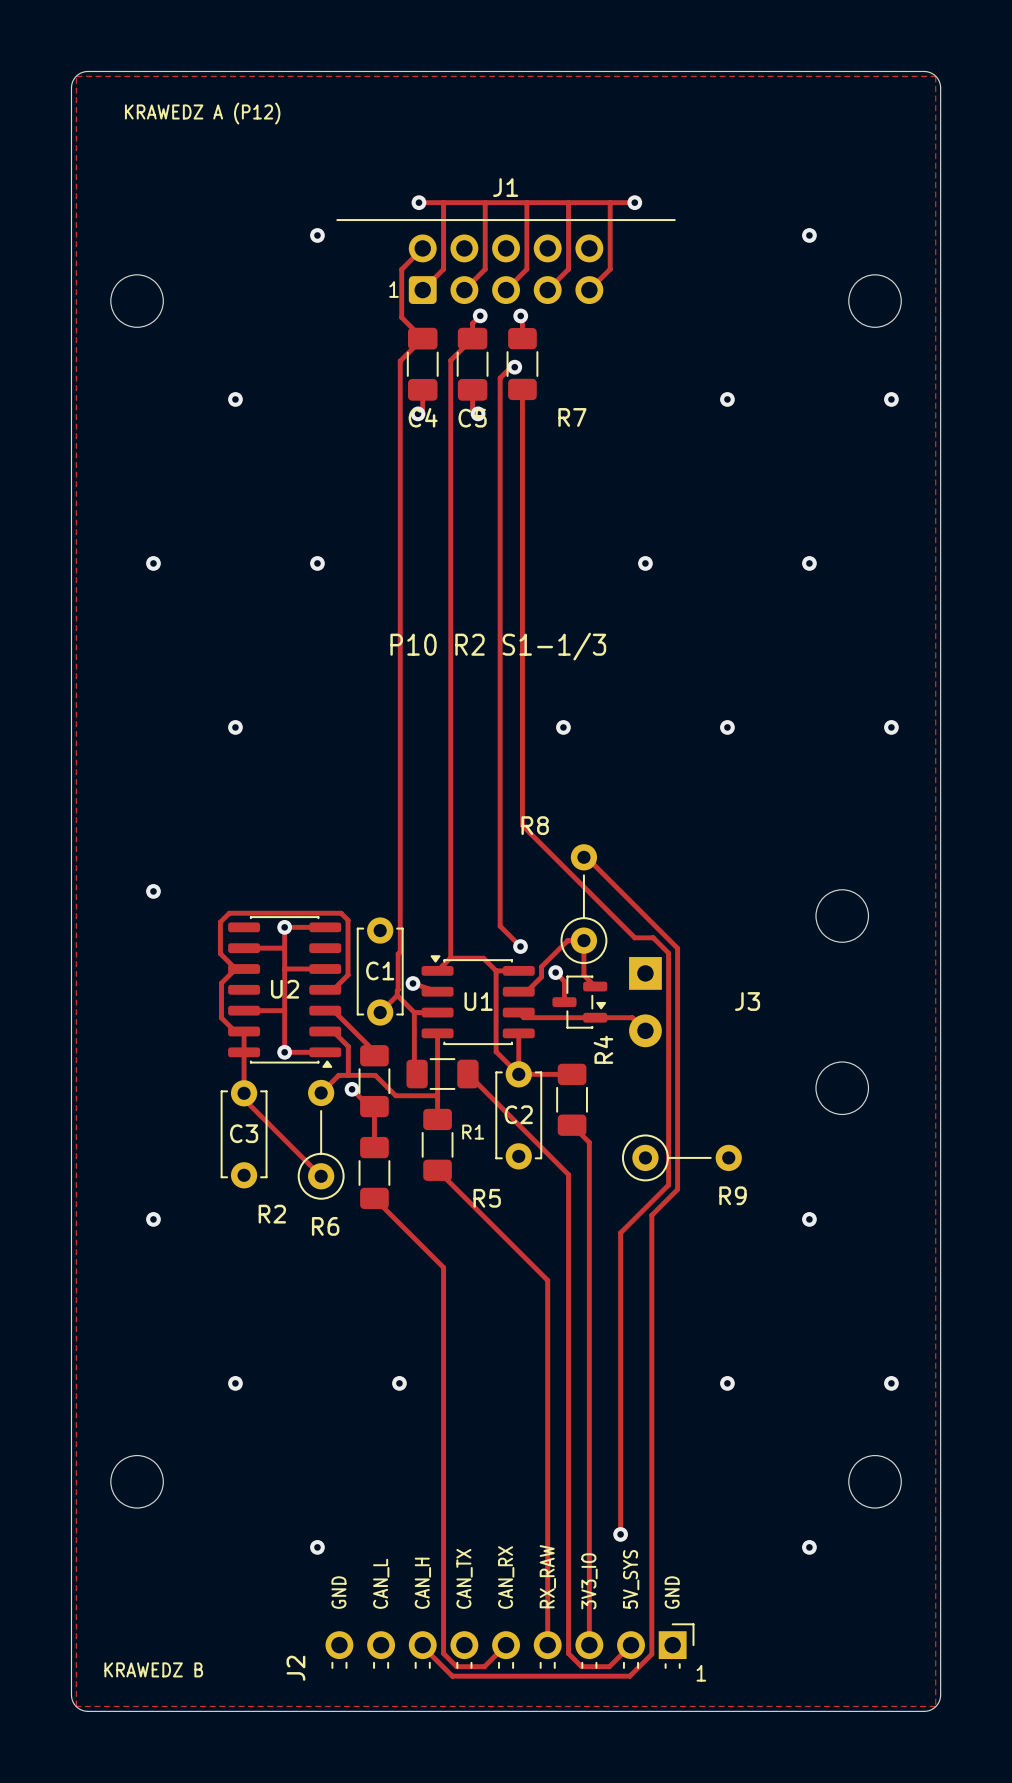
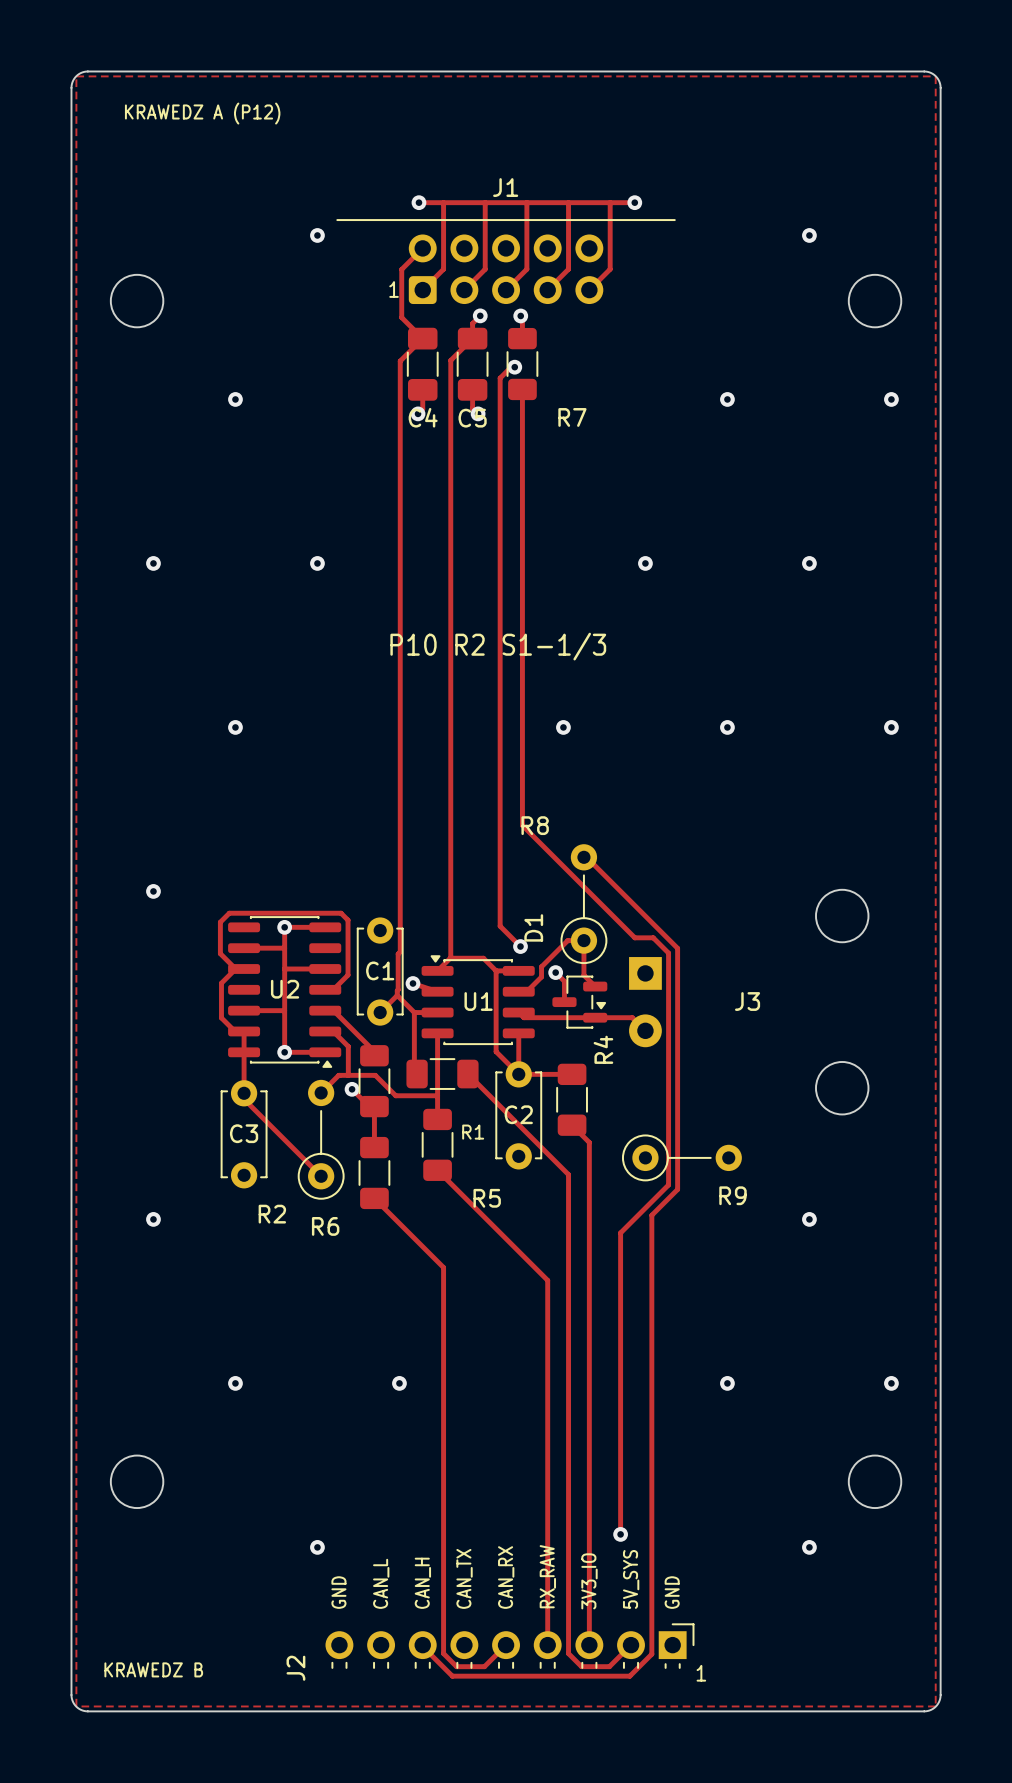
D1 name: none -> D1 (533, 927)

